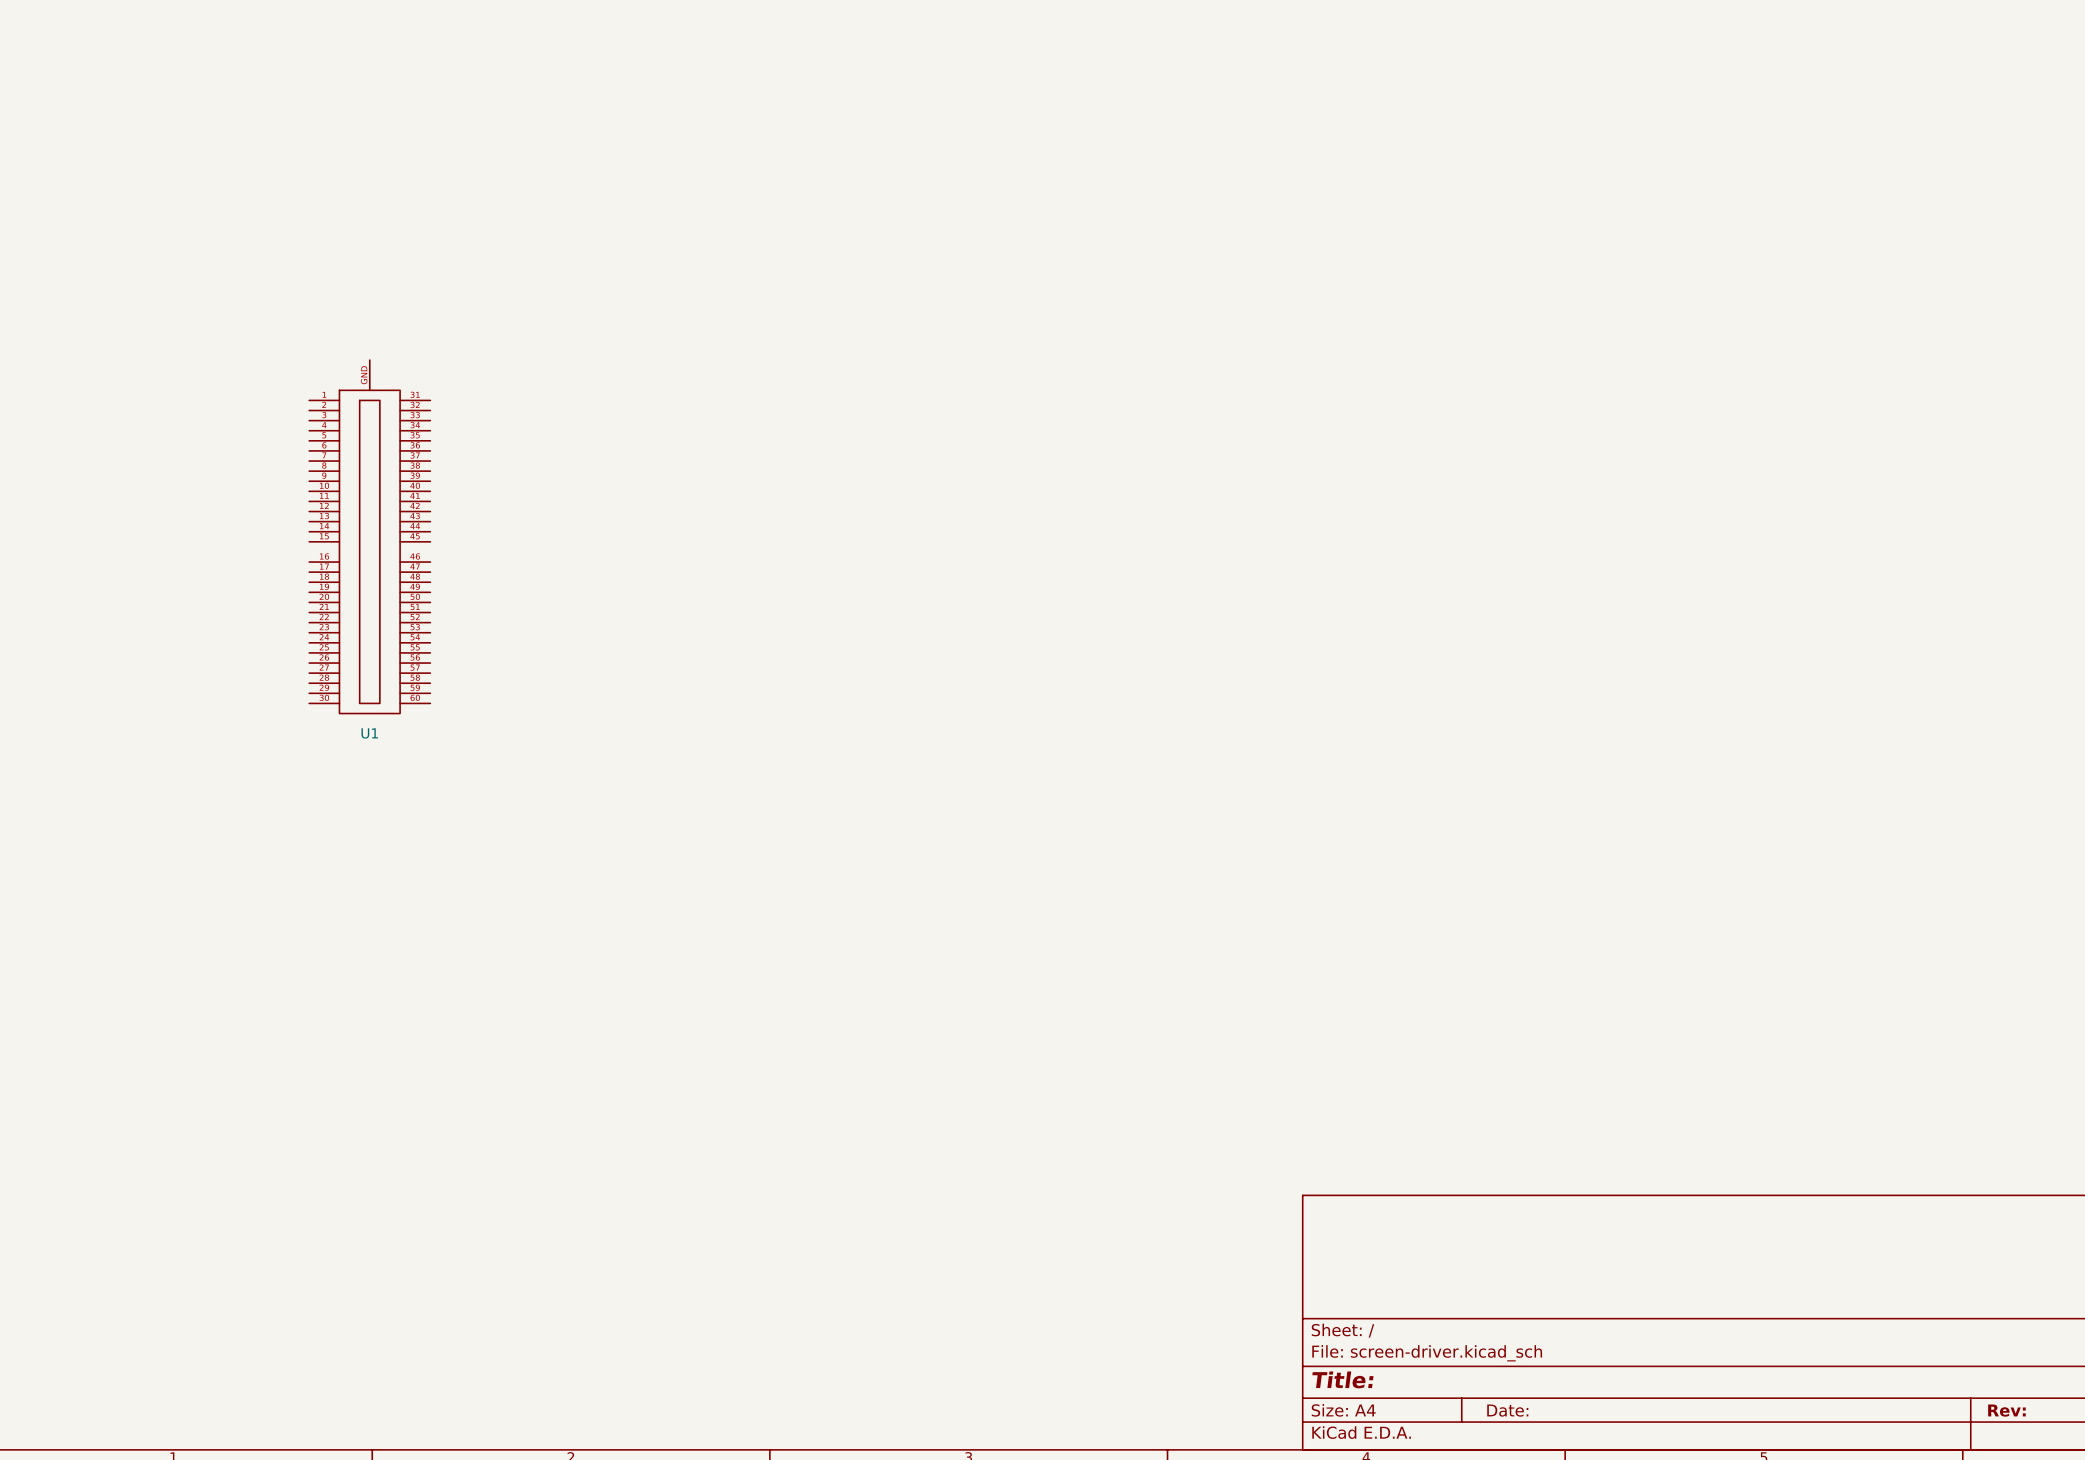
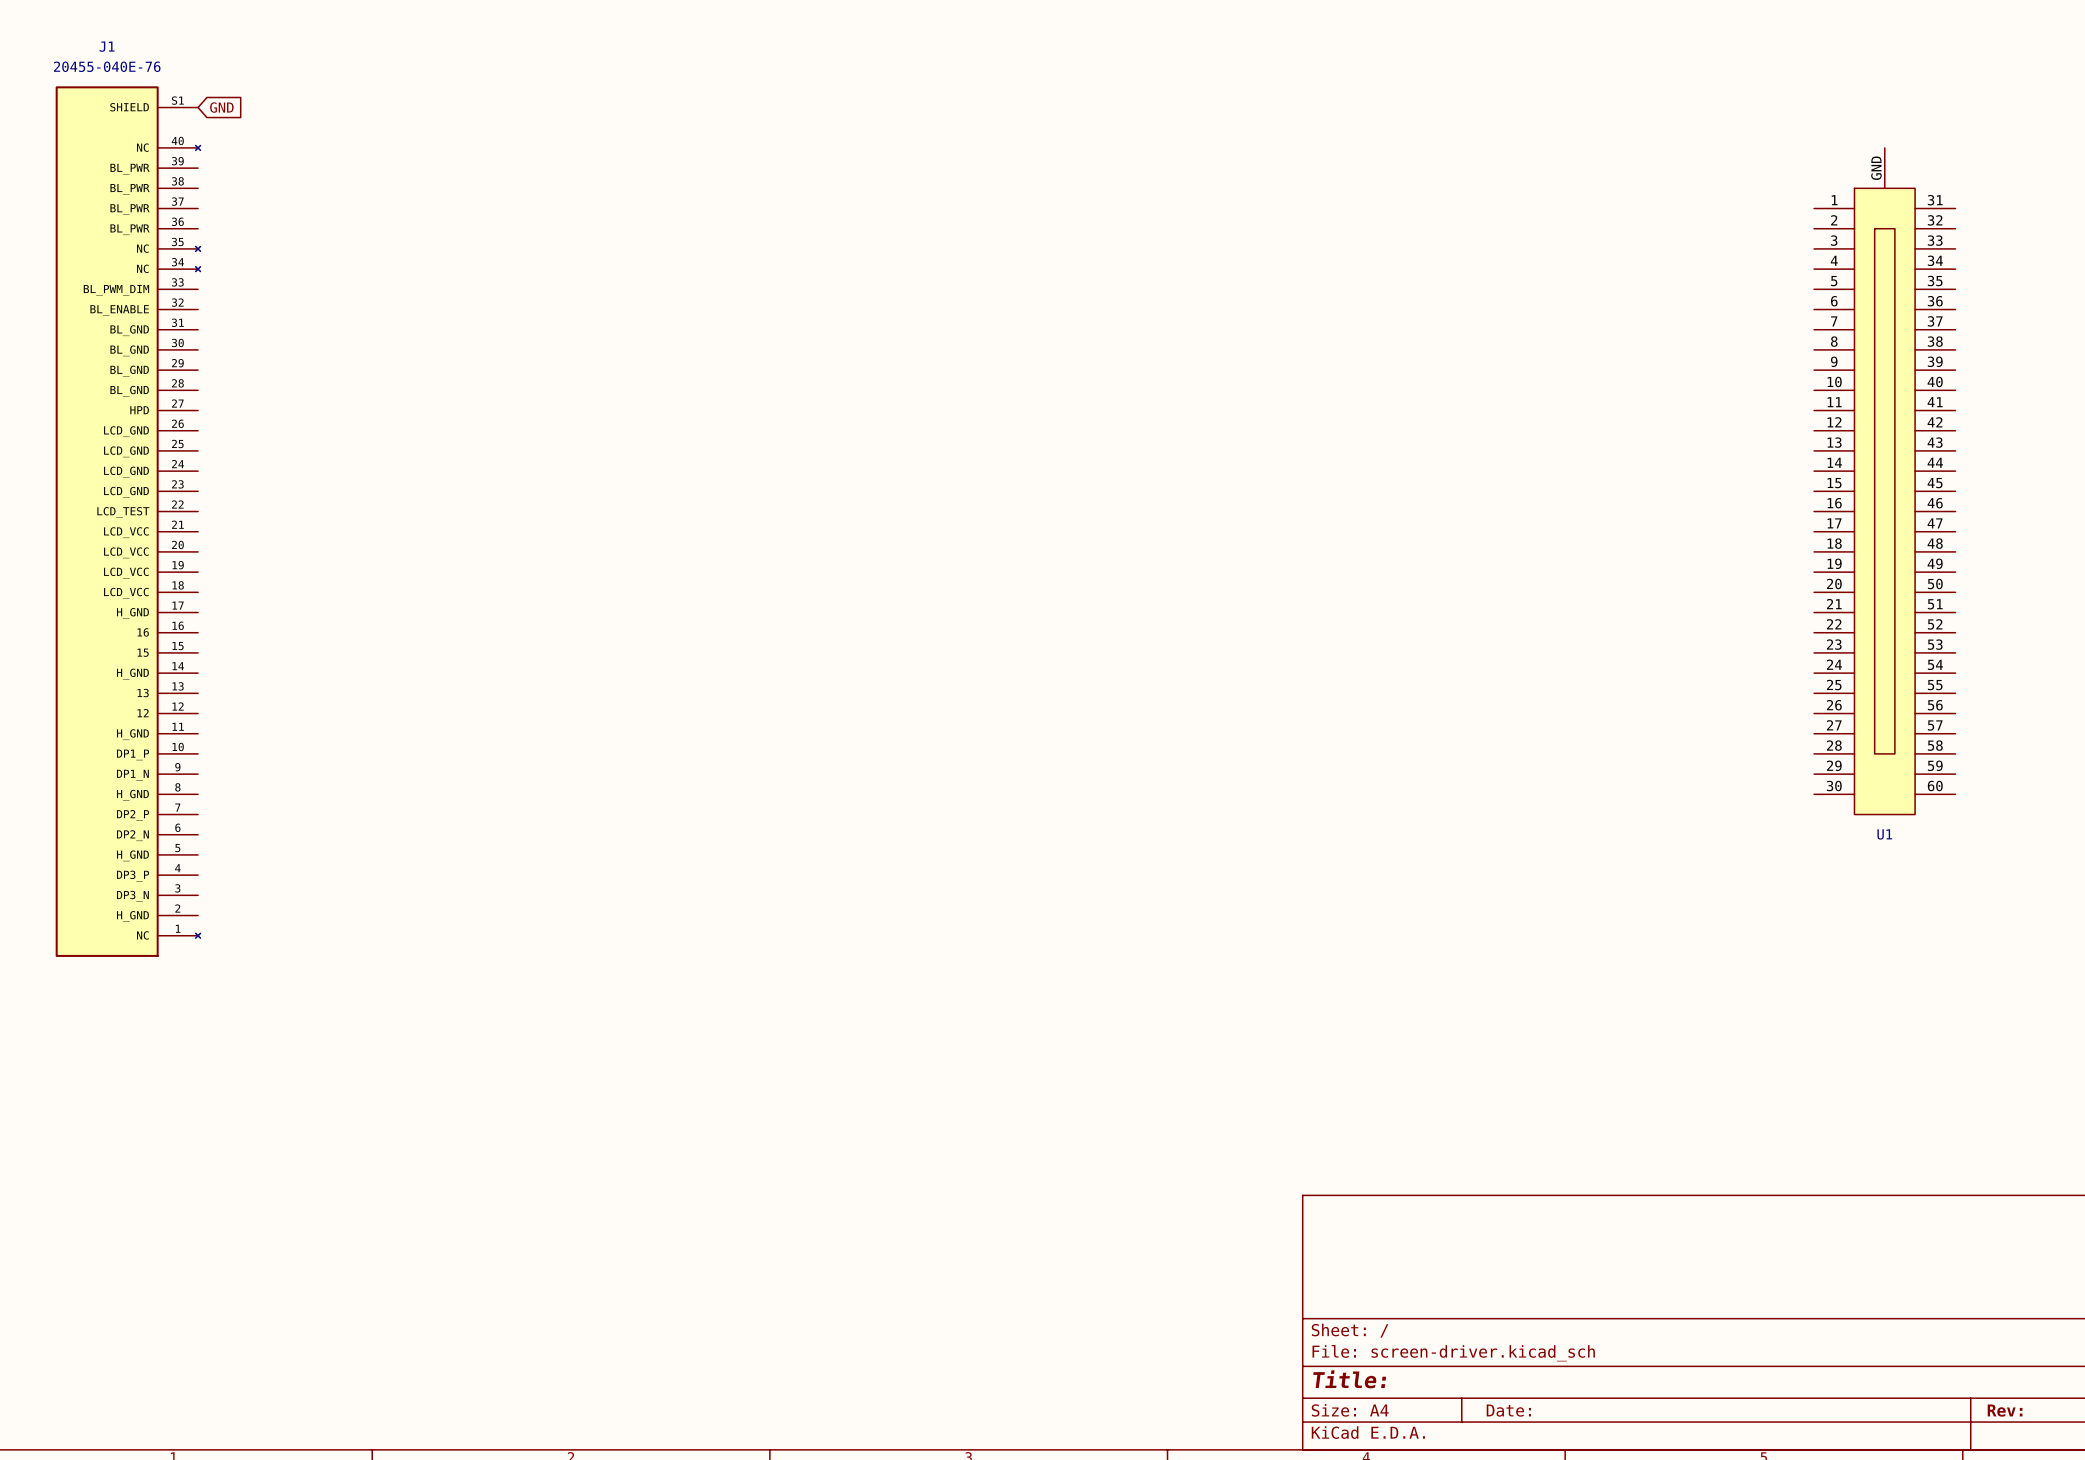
global label: none -> GND (221, 107)
U1 symbol: [309, 360, 431, 714] -> [1814, 147, 1956, 815]
J1: none -> 20455-040E-76 (128, 521)
U1 name position: U1 (369, 733) -> U1 (1884, 834)

